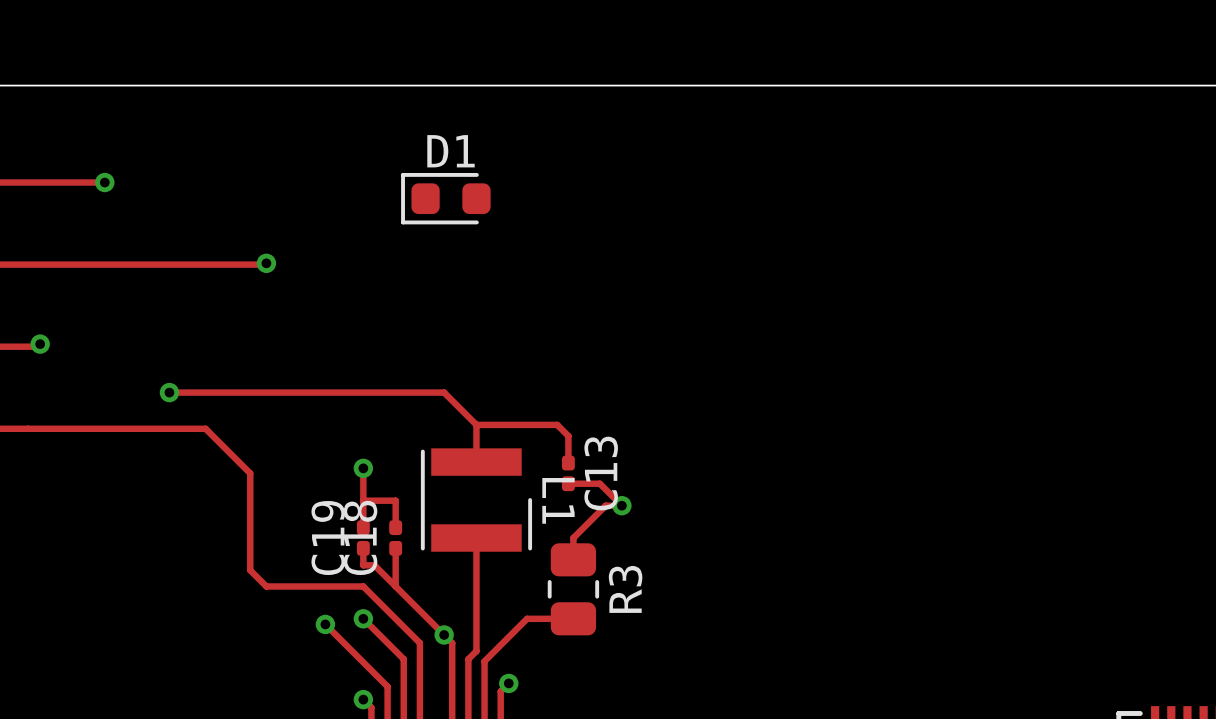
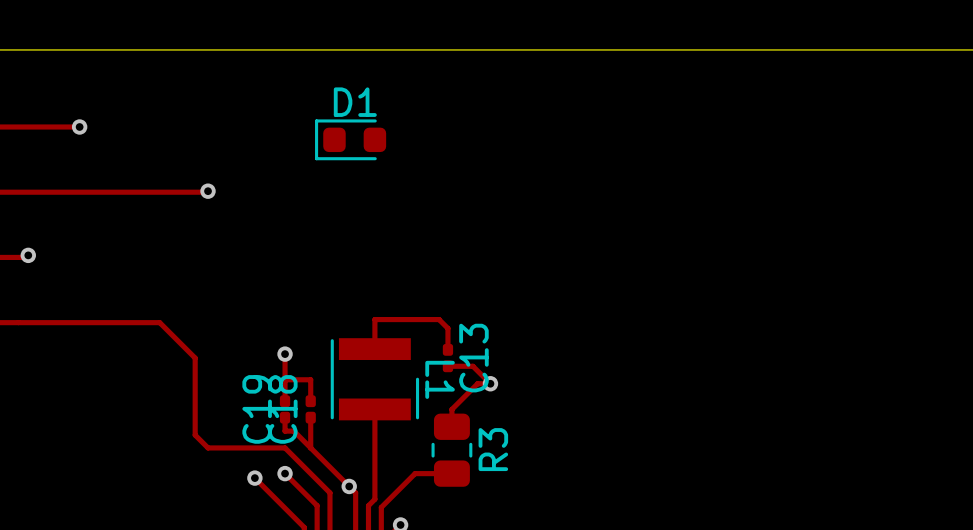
track: (169, 392) (444, 392) (476, 424) -> none
via: (169, 392) -> none

